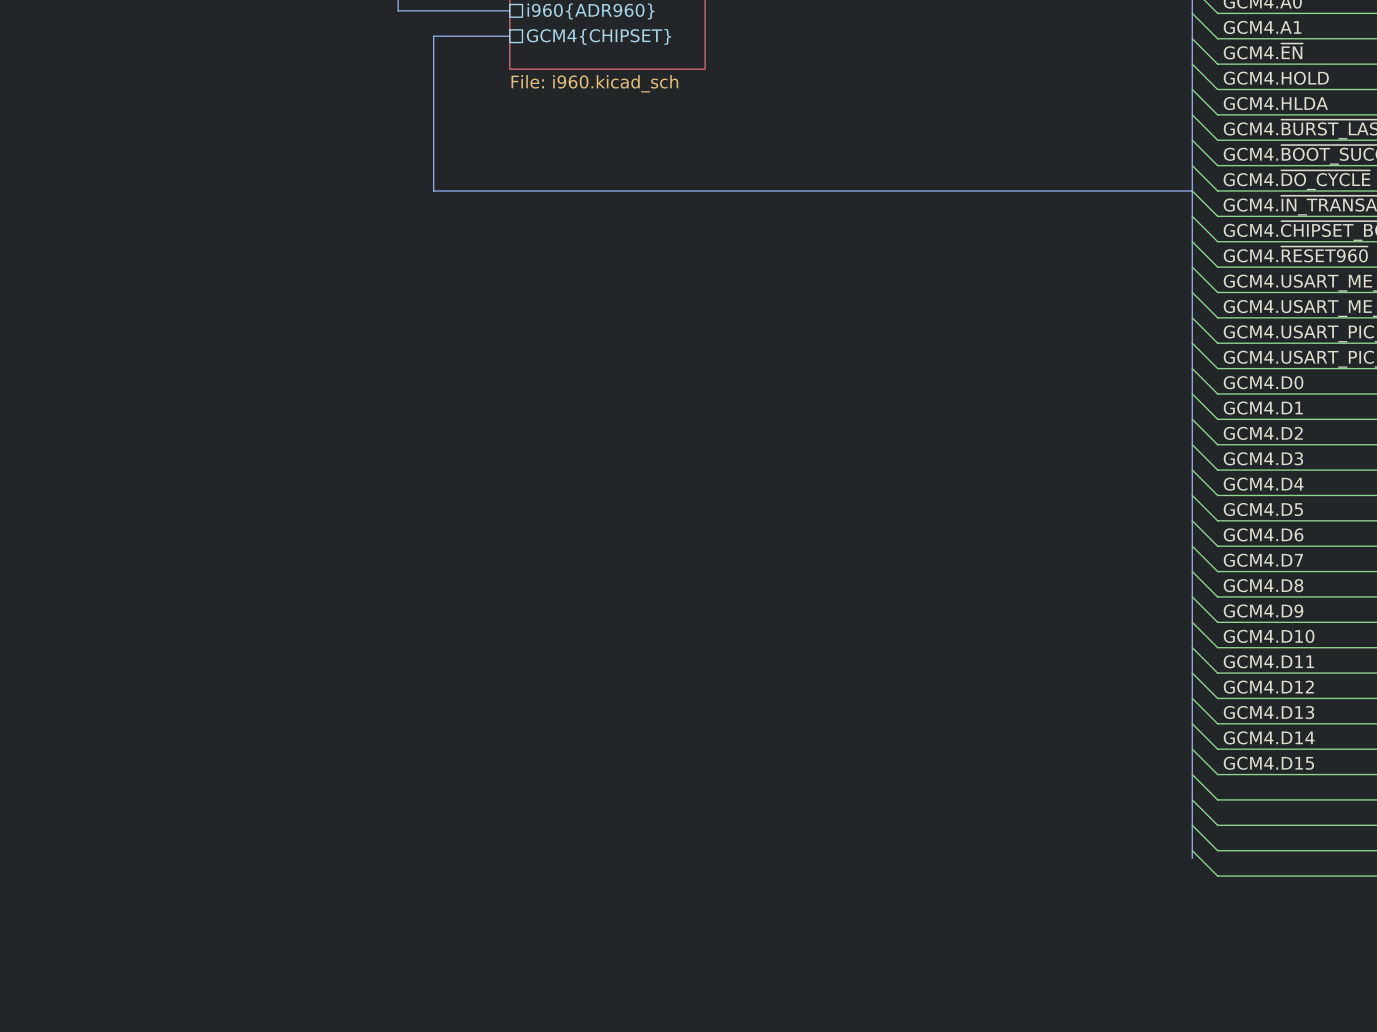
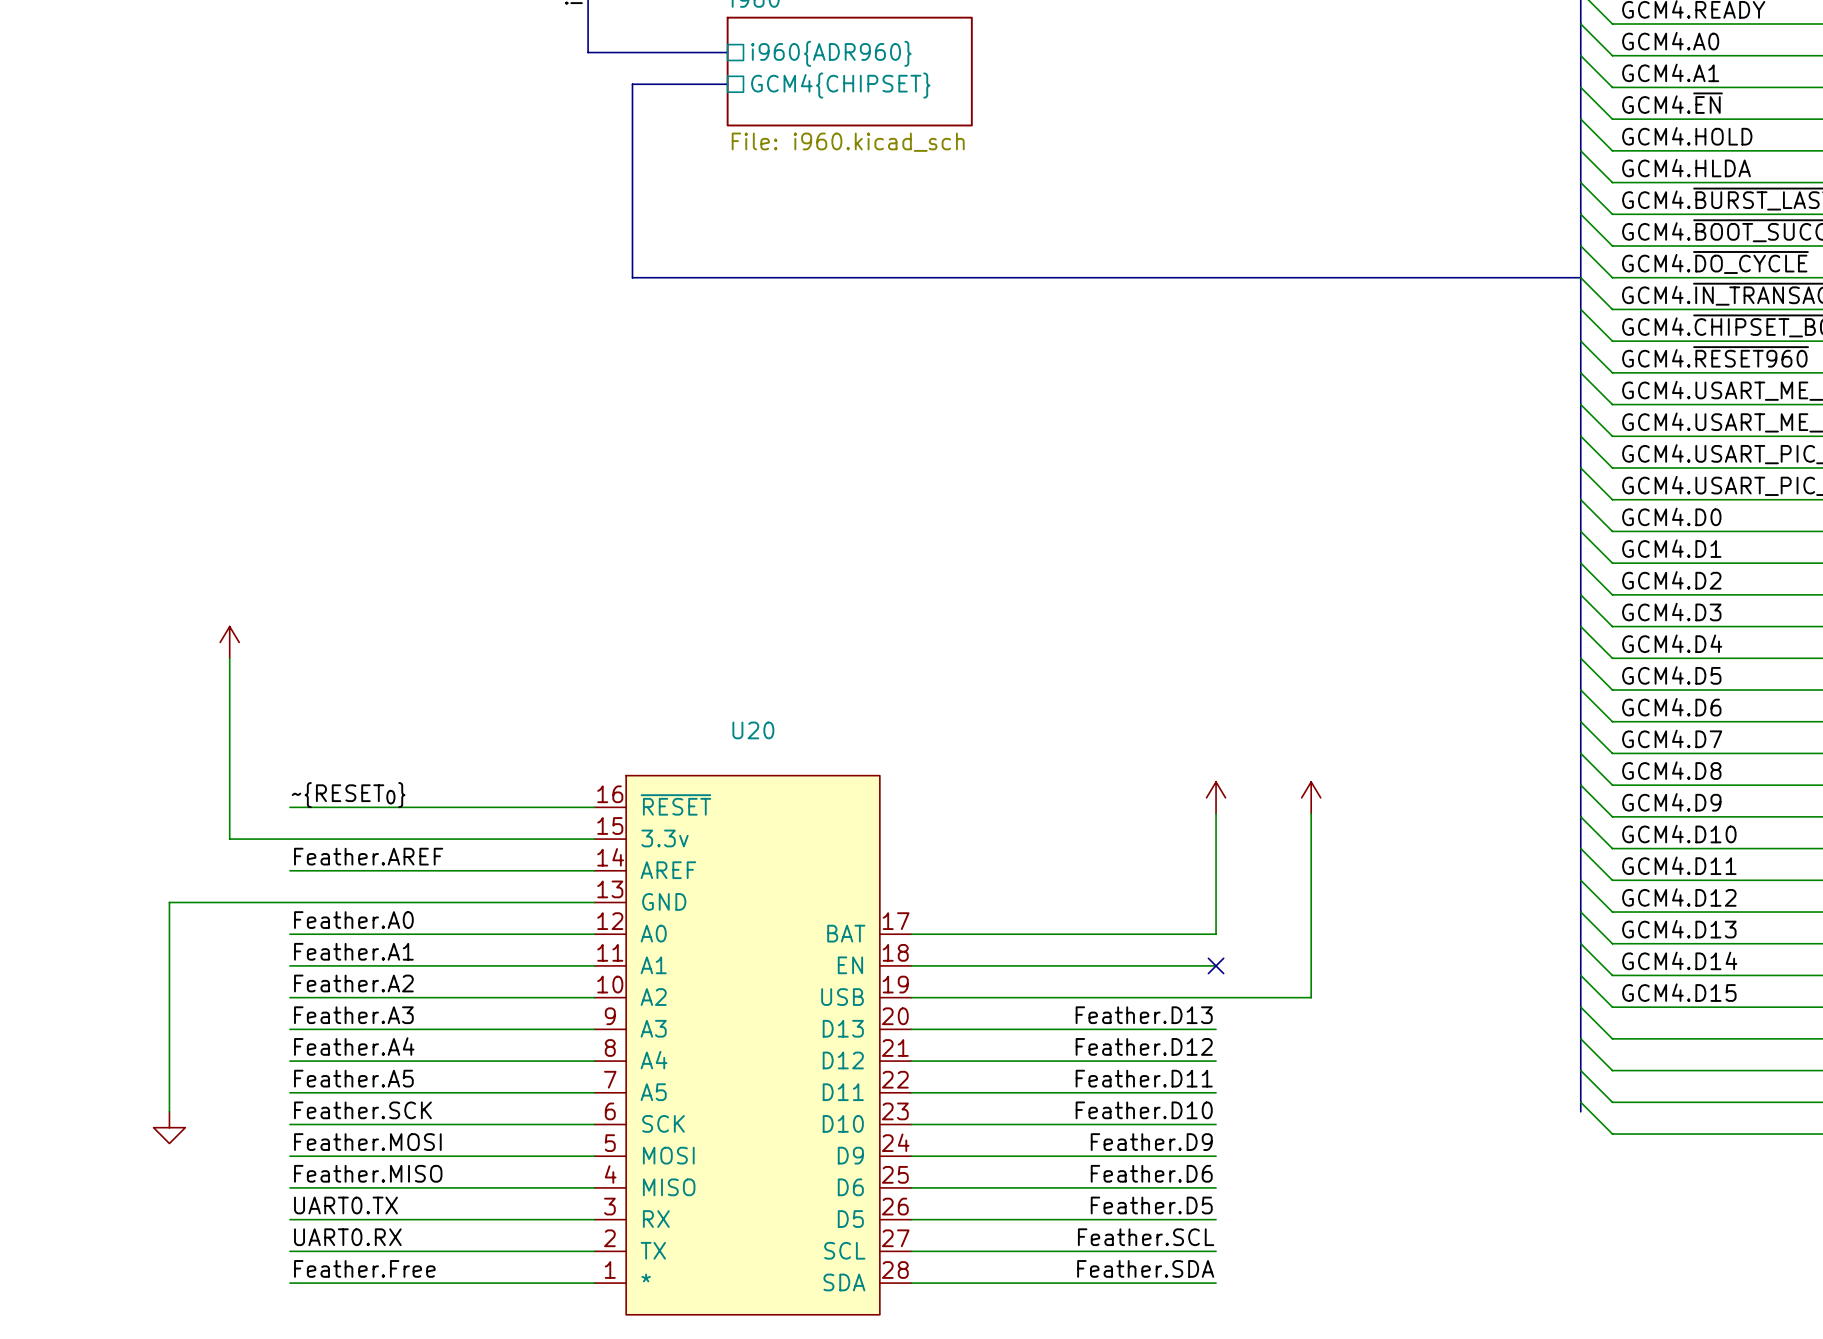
power symbol: none -> (229, 642)
wire: none -> (229, 658) (229, 839) (594, 839)
label: none -> ~{RESET0} (348, 795)
power symbol: none -> (1216, 797)
power symbol: none -> (1311, 797)
wire: none -> (289, 807) (594, 807)
wire: none -> (1216, 813) (1216, 934) (911, 934)
wire: none -> (1311, 813) (1311, 997) (911, 997)
label: none -> Feather.AREF (368, 856)
wire: none -> (289, 870) (594, 870)
wire: none -> (594, 902) (169, 902) (169, 1111)
label: none -> Feather.A0 (353, 920)
wire: none -> (289, 934) (594, 934)
label: none -> Feather.A1 (353, 951)
wire: none -> (289, 965) (594, 965)
wire: none -> (911, 965) (1216, 965)
no-connect mark: none -> (1216, 965)
label: none -> Feather.A2 (353, 983)
wire: none -> (289, 997) (594, 997)
label: none -> Feather.A3 (353, 1015)
label: none -> Feather.D13 (1144, 1015)
wire: none -> (289, 1029) (594, 1029)
wire: none -> (911, 1029) (1216, 1029)
U20: none -> (753, 1045)
label: none -> Feather.A4 (354, 1046)
label: none -> Feather.D12 (1144, 1046)
wire: none -> (289, 1061) (594, 1061)
wire: none -> (911, 1061) (1216, 1061)
label: none -> Feather.A5 (353, 1078)
label: none -> Feather.D11 (1144, 1078)
wire: none -> (289, 1092) (594, 1092)
wire: none -> (911, 1092) (1216, 1092)
label: none -> Feather.SCK (362, 1110)
label: none -> Feather.D10 (1144, 1110)
wire: none -> (289, 1124) (594, 1124)
wire: none -> (911, 1124) (1216, 1124)
power symbol: none -> (169, 1127)
label: none -> Feather.MOSI (367, 1142)
label: none -> Feather.D9 (1151, 1142)
wire: none -> (289, 1156) (594, 1156)
wire: none -> (911, 1156) (1216, 1156)
label: none -> Feather.MISO (368, 1173)
label: none -> Feather.D6 (1151, 1173)
wire: none -> (289, 1187) (594, 1187)
wire: none -> (911, 1187) (1216, 1187)
label: none -> UART0.TX (345, 1205)
label: none -> Feather.D5 (1151, 1205)
wire: none -> (289, 1219) (594, 1219)
wire: none -> (911, 1219) (1216, 1219)
label: none -> UART0.RX (347, 1237)
label: none -> Feather.SCL (1146, 1237)
wire: none -> (289, 1251) (594, 1251)
wire: none -> (911, 1251) (1216, 1251)
label: none -> Feather.Free (364, 1268)
label: none -> Feather.SDA (1145, 1268)
wire: none -> (289, 1283) (594, 1283)
wire: none -> (911, 1283) (1216, 1283)

